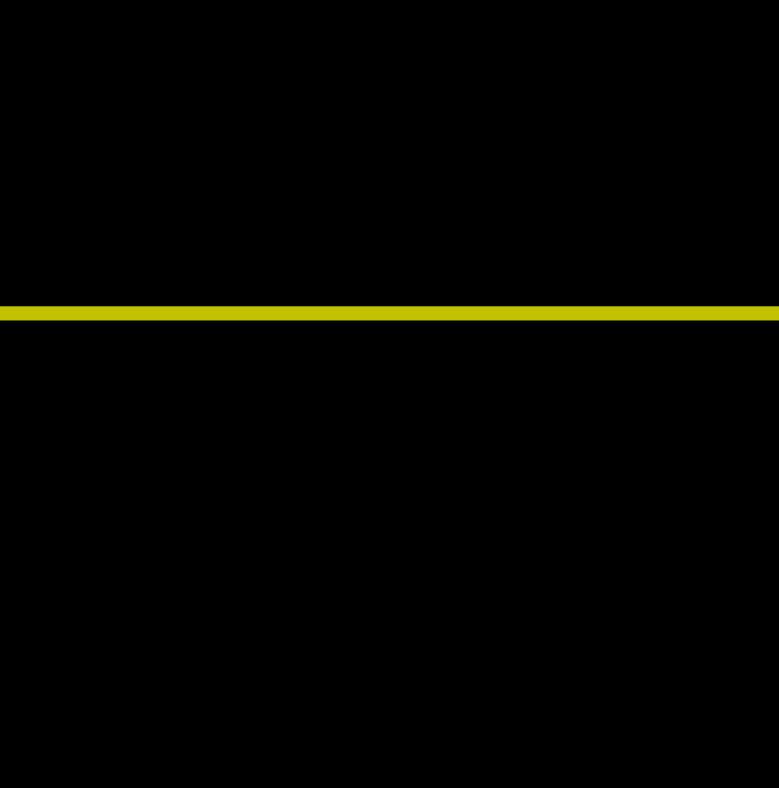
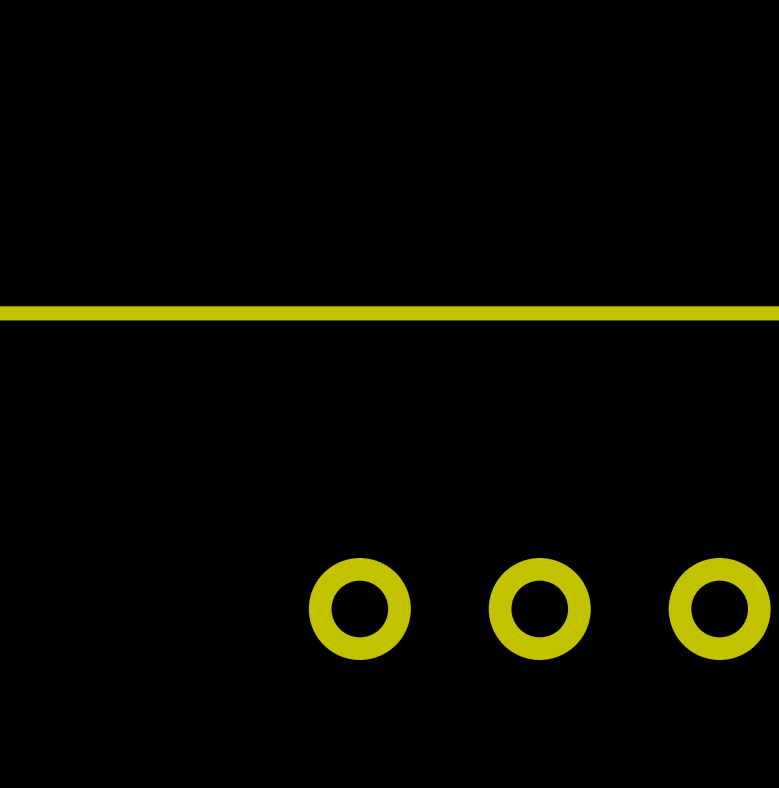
part: none -> (539, 609)

